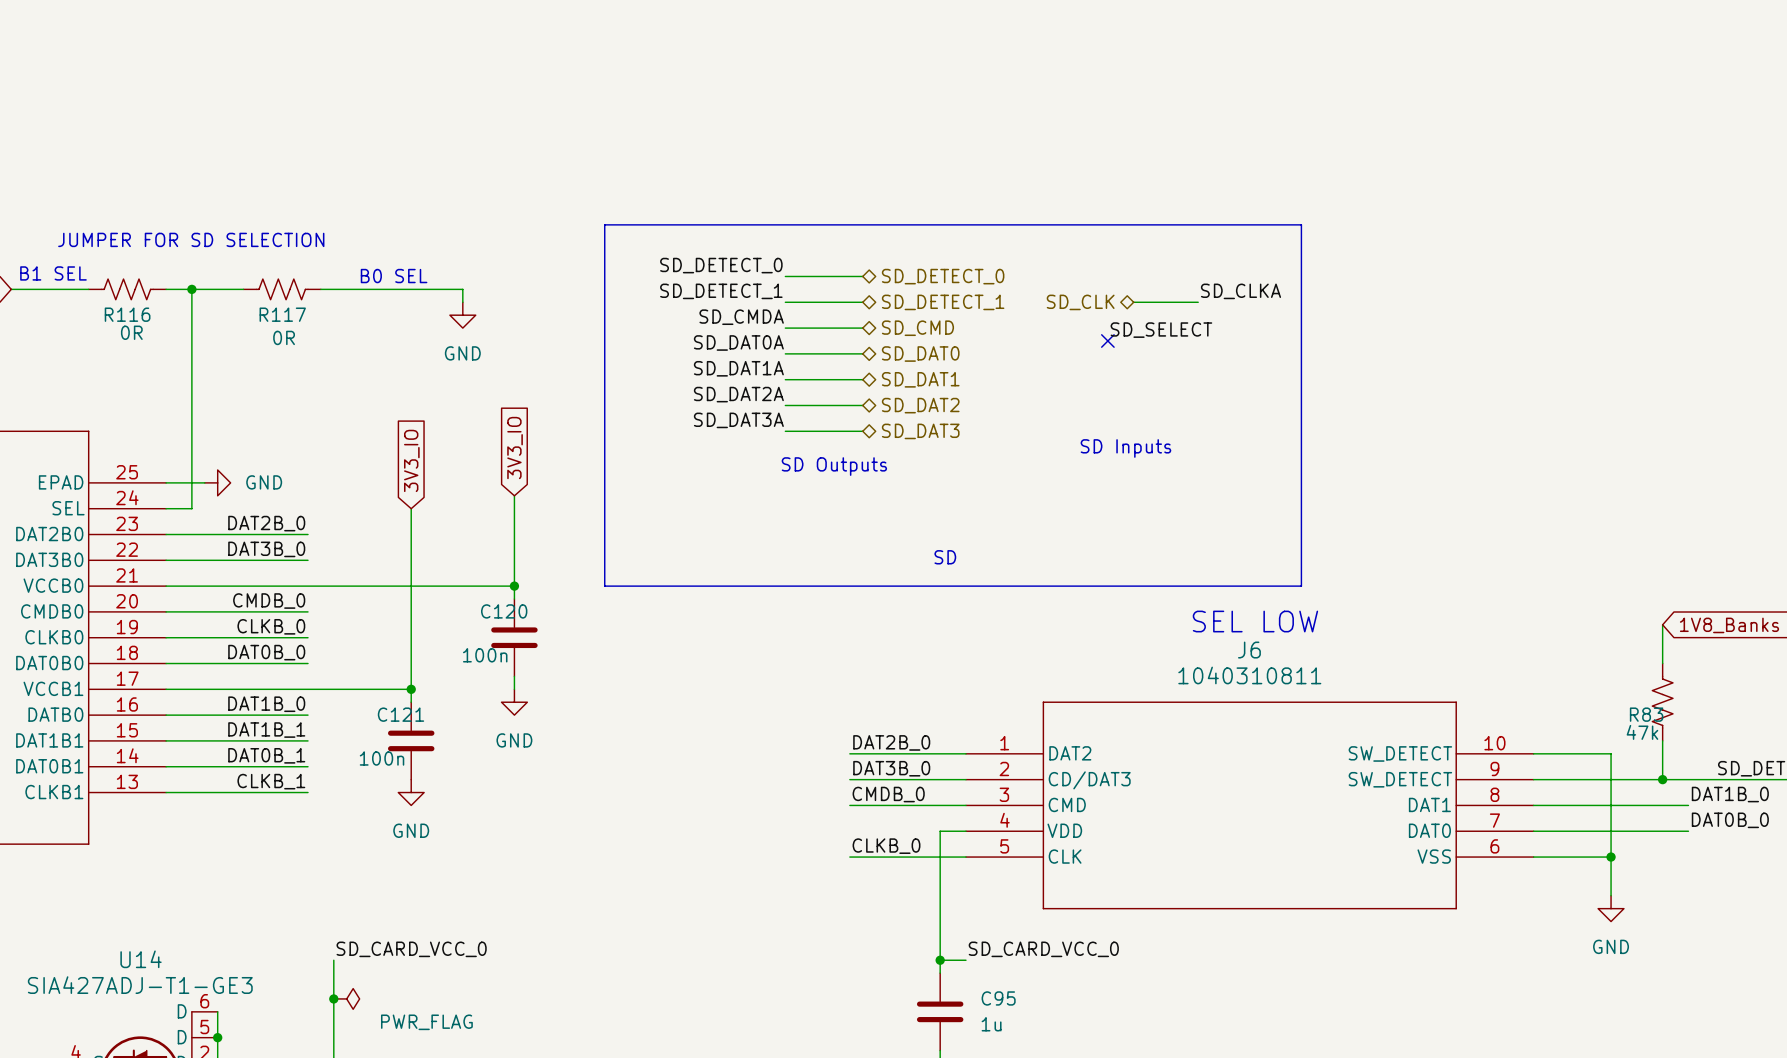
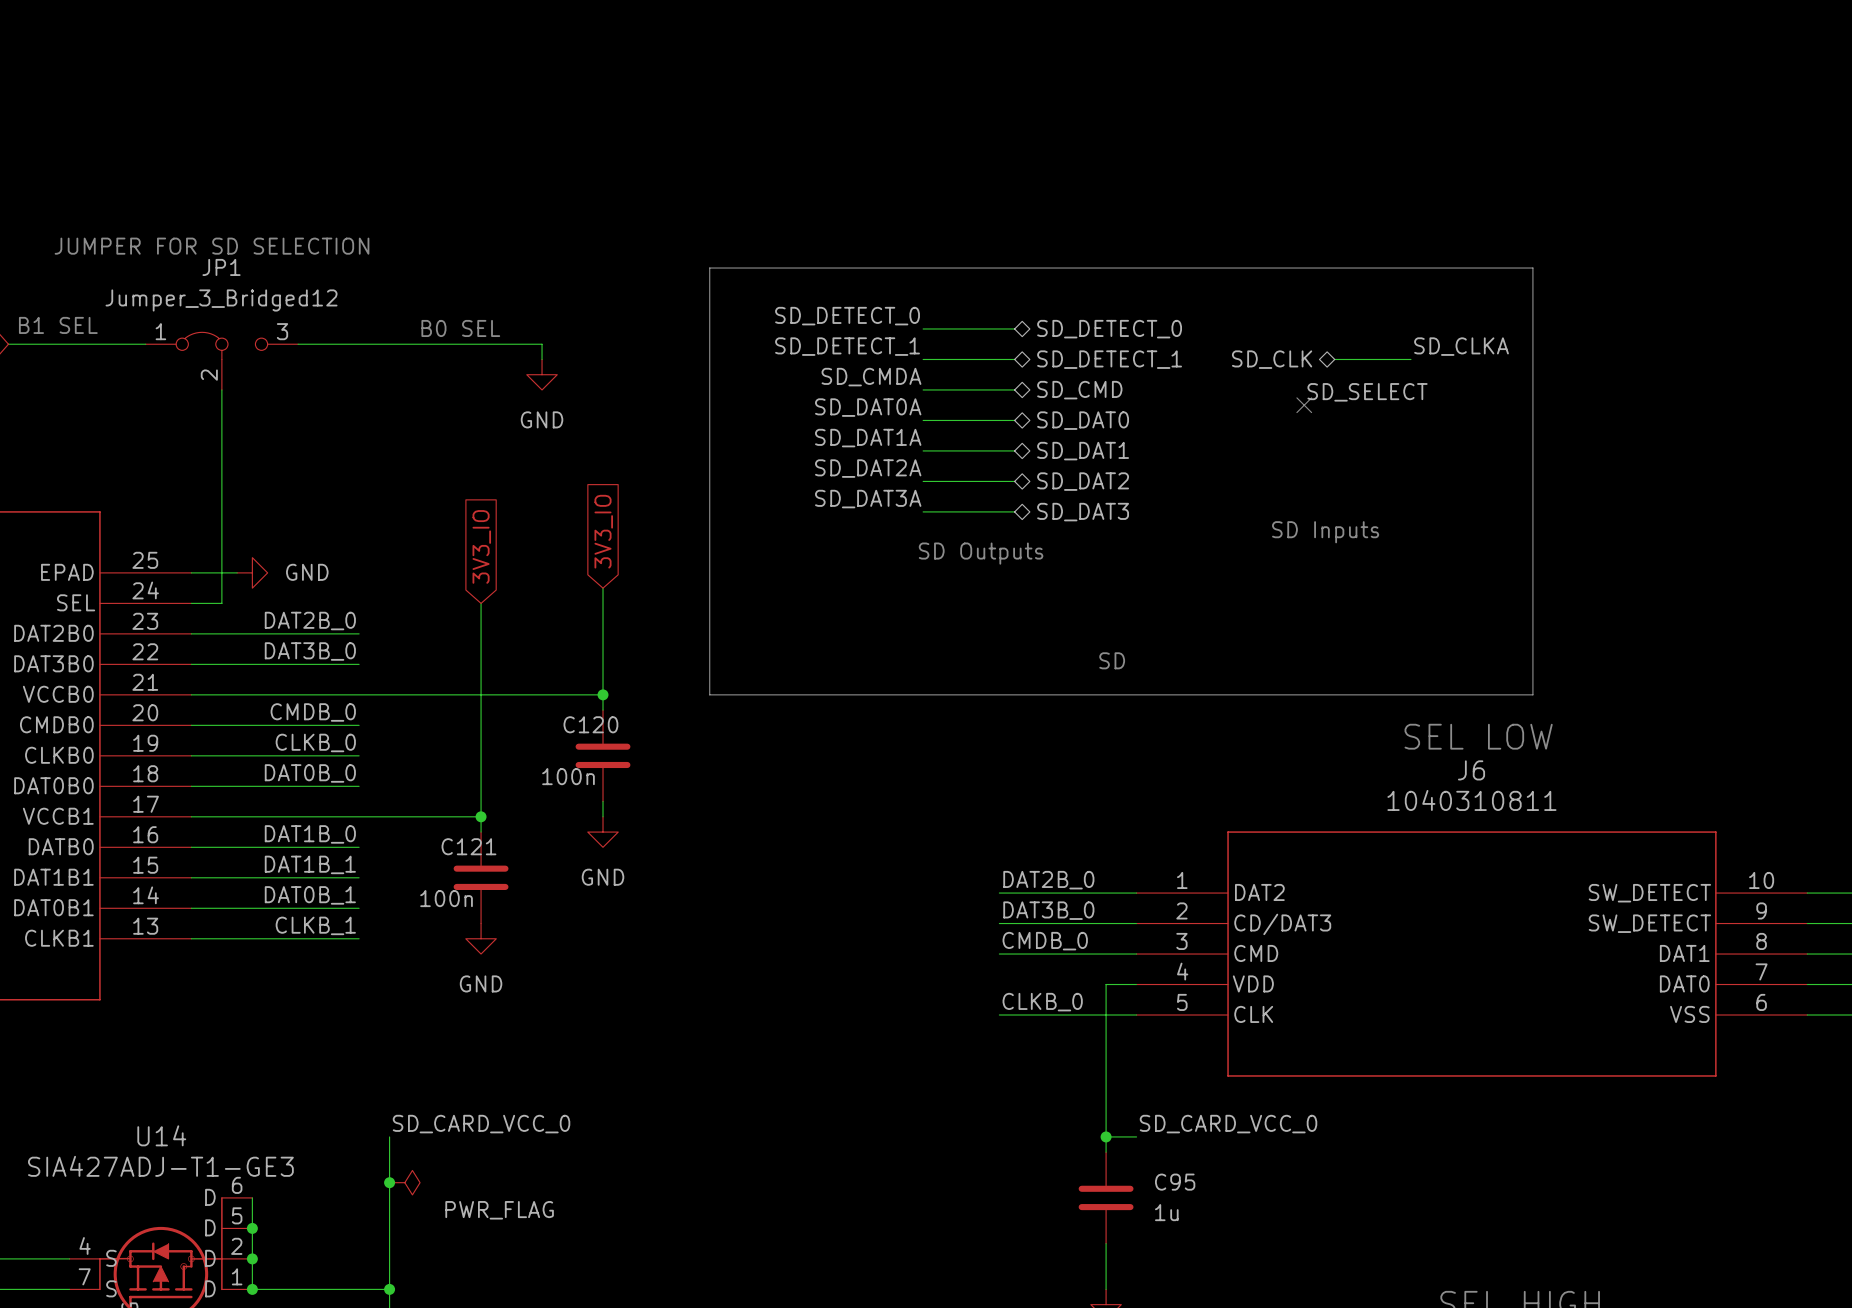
text position: JUMPER FOR SD SELECTION (191, 239) -> JUMPER FOR SD SELECTION (212, 246)
wire: none -> (99, 344) (145, 344)
R116: 0R (127, 289) -> none
wire: (166, 289) (243, 289) -> none
junction: (191, 289) -> none
wire: none -> (298, 344) (374, 344)
R117: 0R (282, 289) -> none
JP1: none -> Jumper_3_Bridged12 (221, 361)

